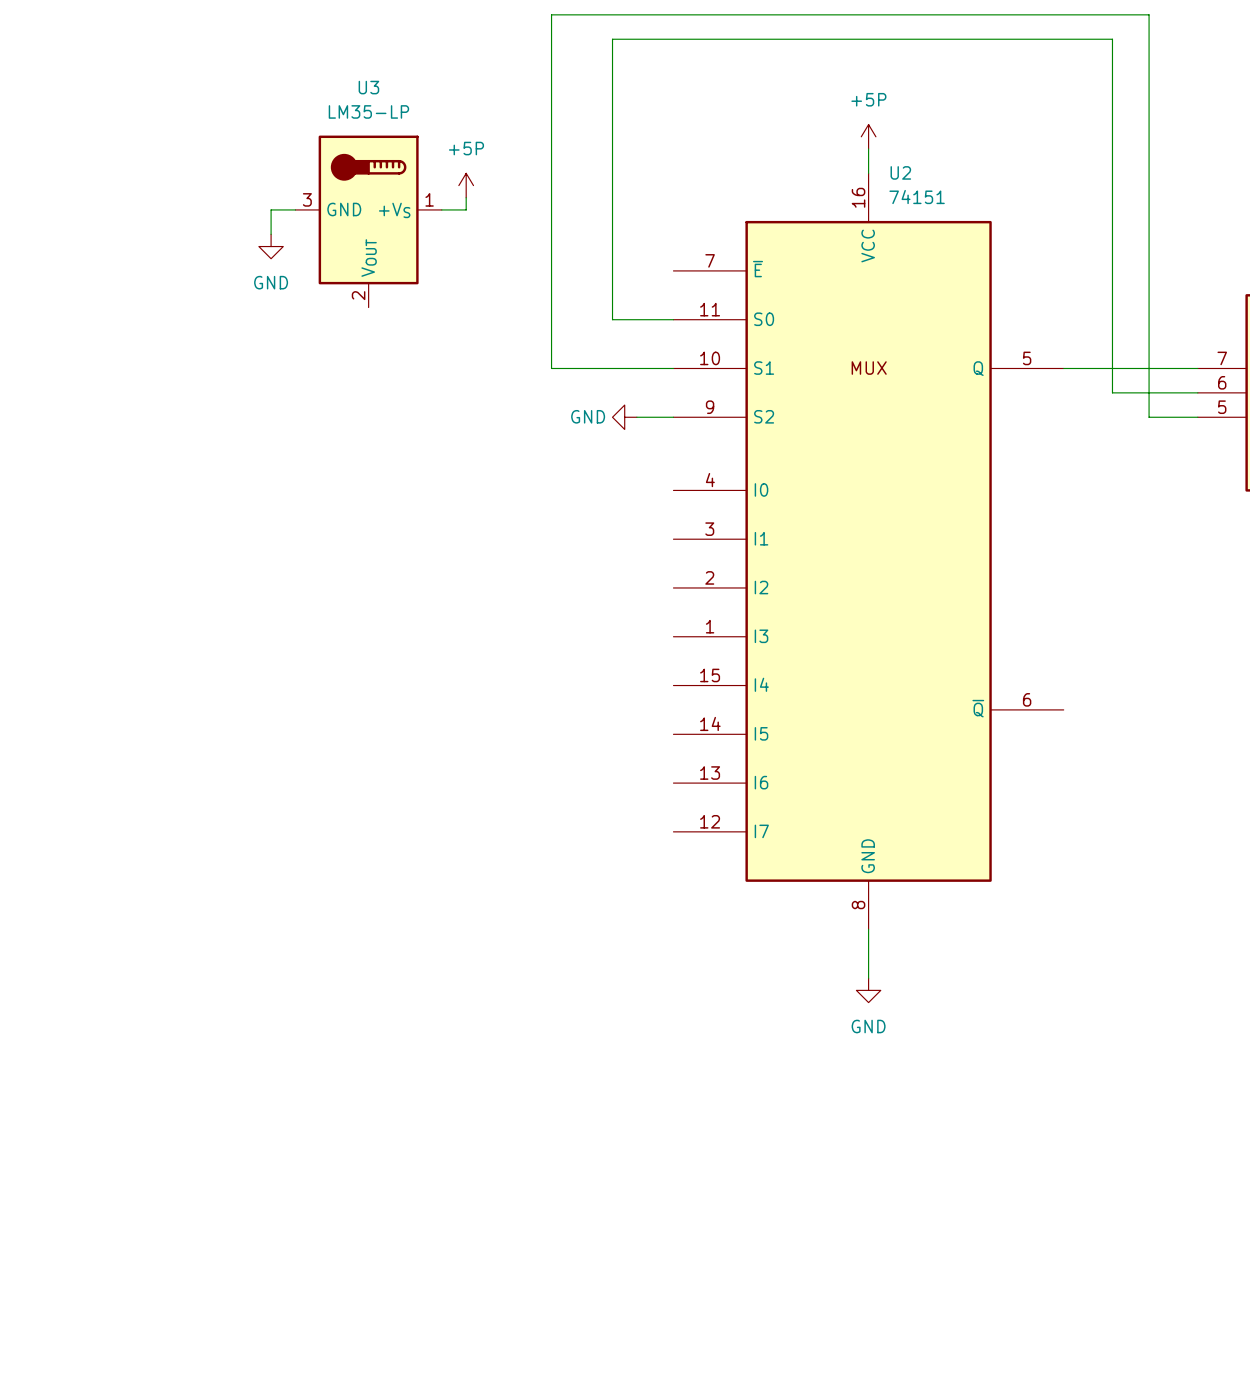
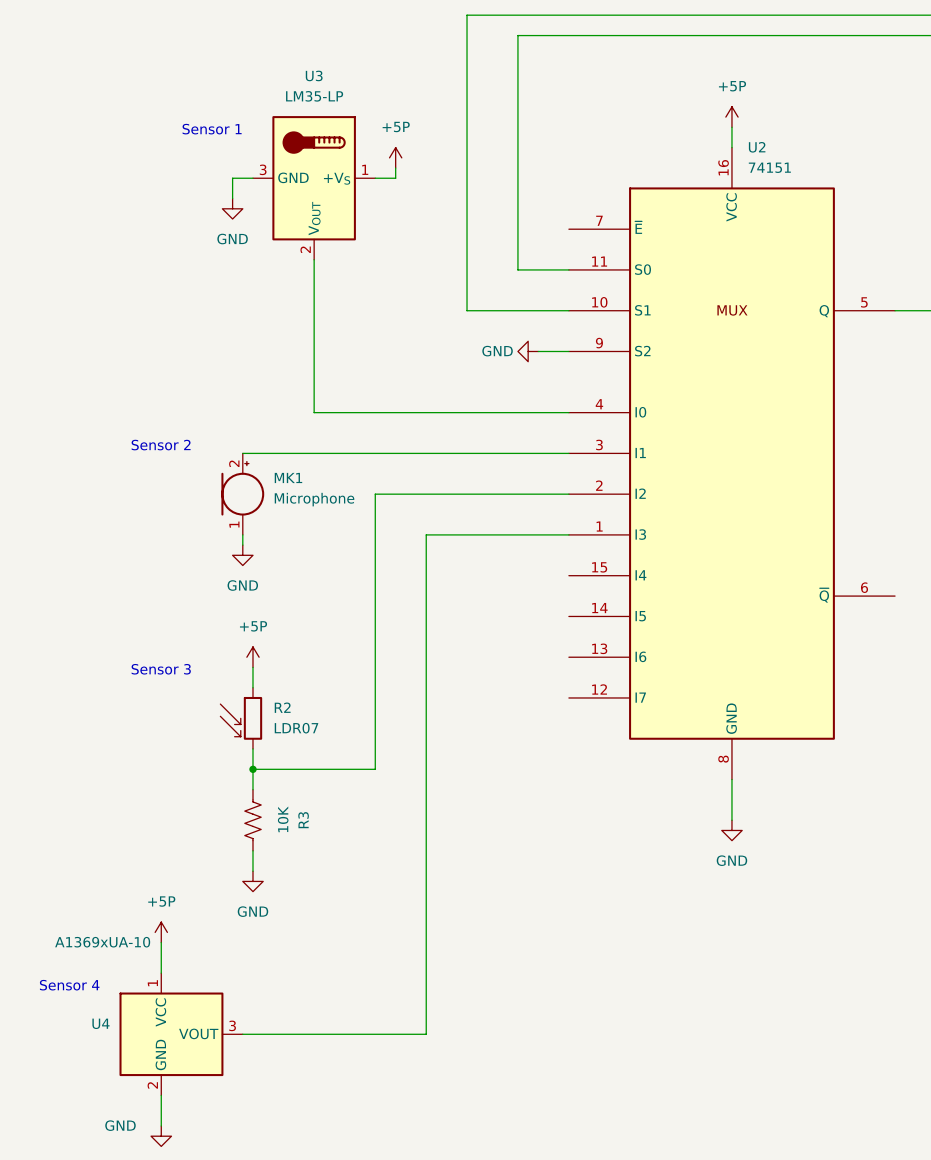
text: none -> Sensor 1 (212, 129)
wire: none -> (314, 259) (314, 412) (568, 412)
text: none -> Sensor 2 (161, 445)
wire: none -> (242, 453) (568, 453)
MK1: none -> Microphone (242, 494)
wire: none -> (568, 494) (375, 494) (375, 769) (252, 769)
wire: none -> (242, 534) (242, 545)
wire: none -> (568, 534) (426, 534) (426, 1034) (242, 1034)
power symbol: none -> GND (242, 555)
power symbol: none -> +5P (252, 657)
wire: none -> (252, 667) (252, 687)
text: none -> Sensor 3 (161, 669)
R2: none -> LDR07 (241, 718)
wire: none -> (252, 748) (252, 789)
junction: none -> (252, 769)
R3: none -> 10K (252, 820)
wire: none -> (252, 850) (252, 871)
power symbol: none -> GND (252, 881)
power symbol: none -> +5P (161, 932)
wire: none -> (161, 942) (161, 973)
text: none -> Sensor 4 (69, 985)
U4: none -> A1369xUA-10 (181, 1034)
wire: none -> (161, 1095) (161, 1126)
power symbol: none -> GND (161, 1136)

